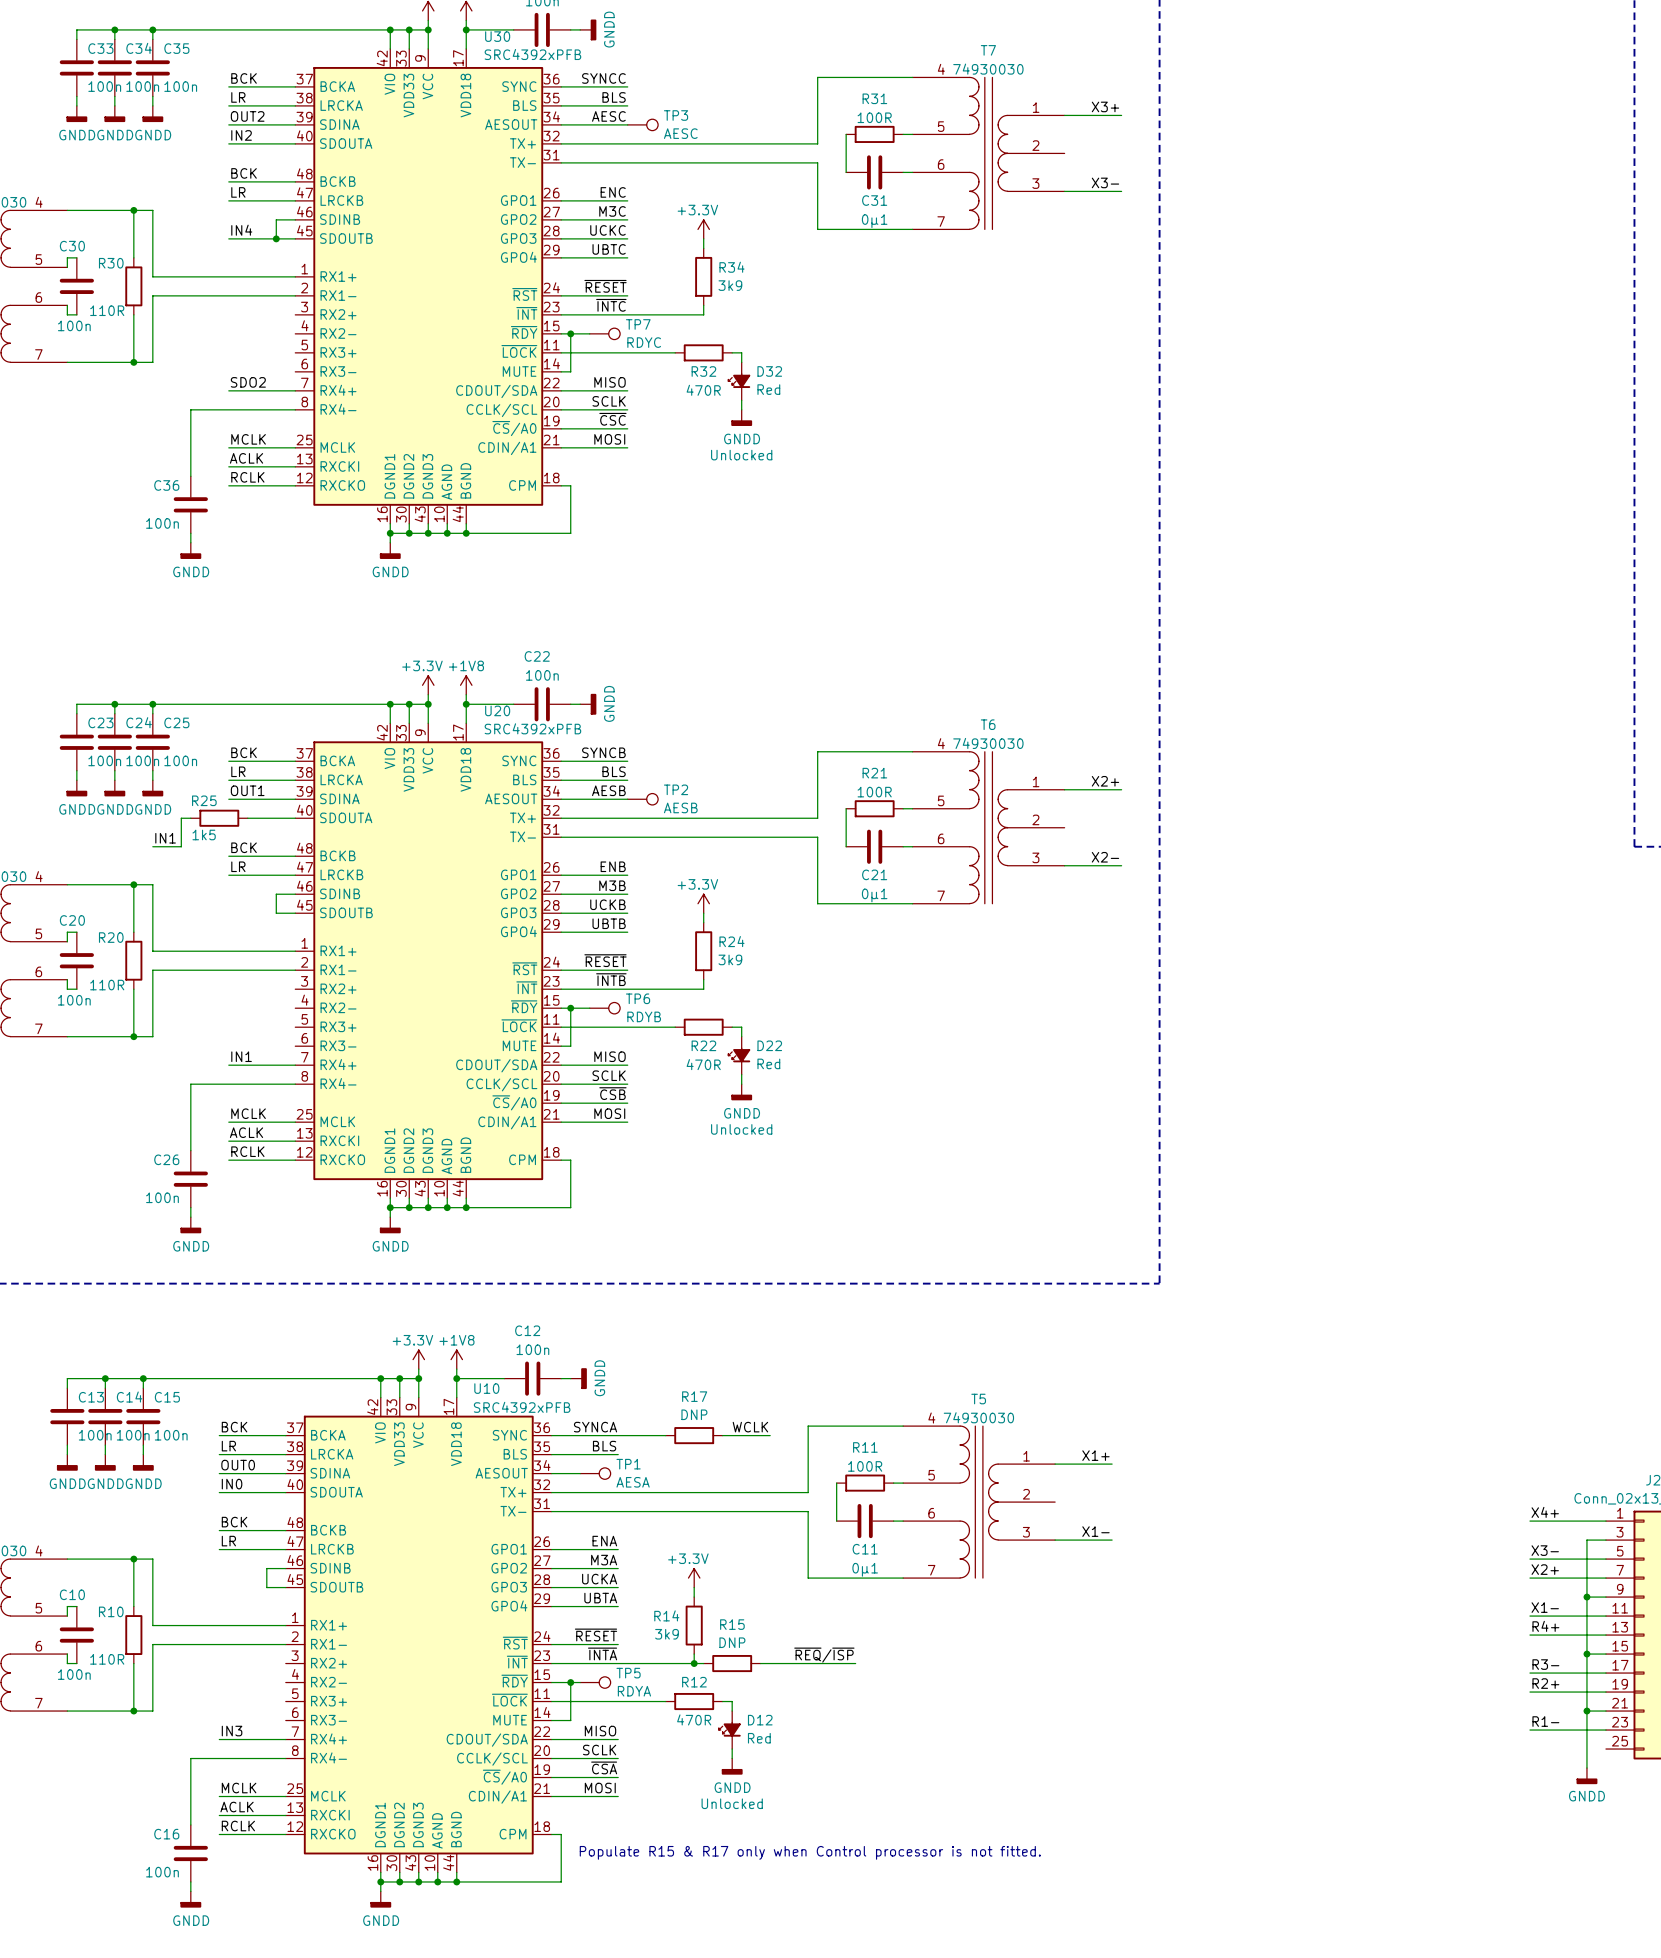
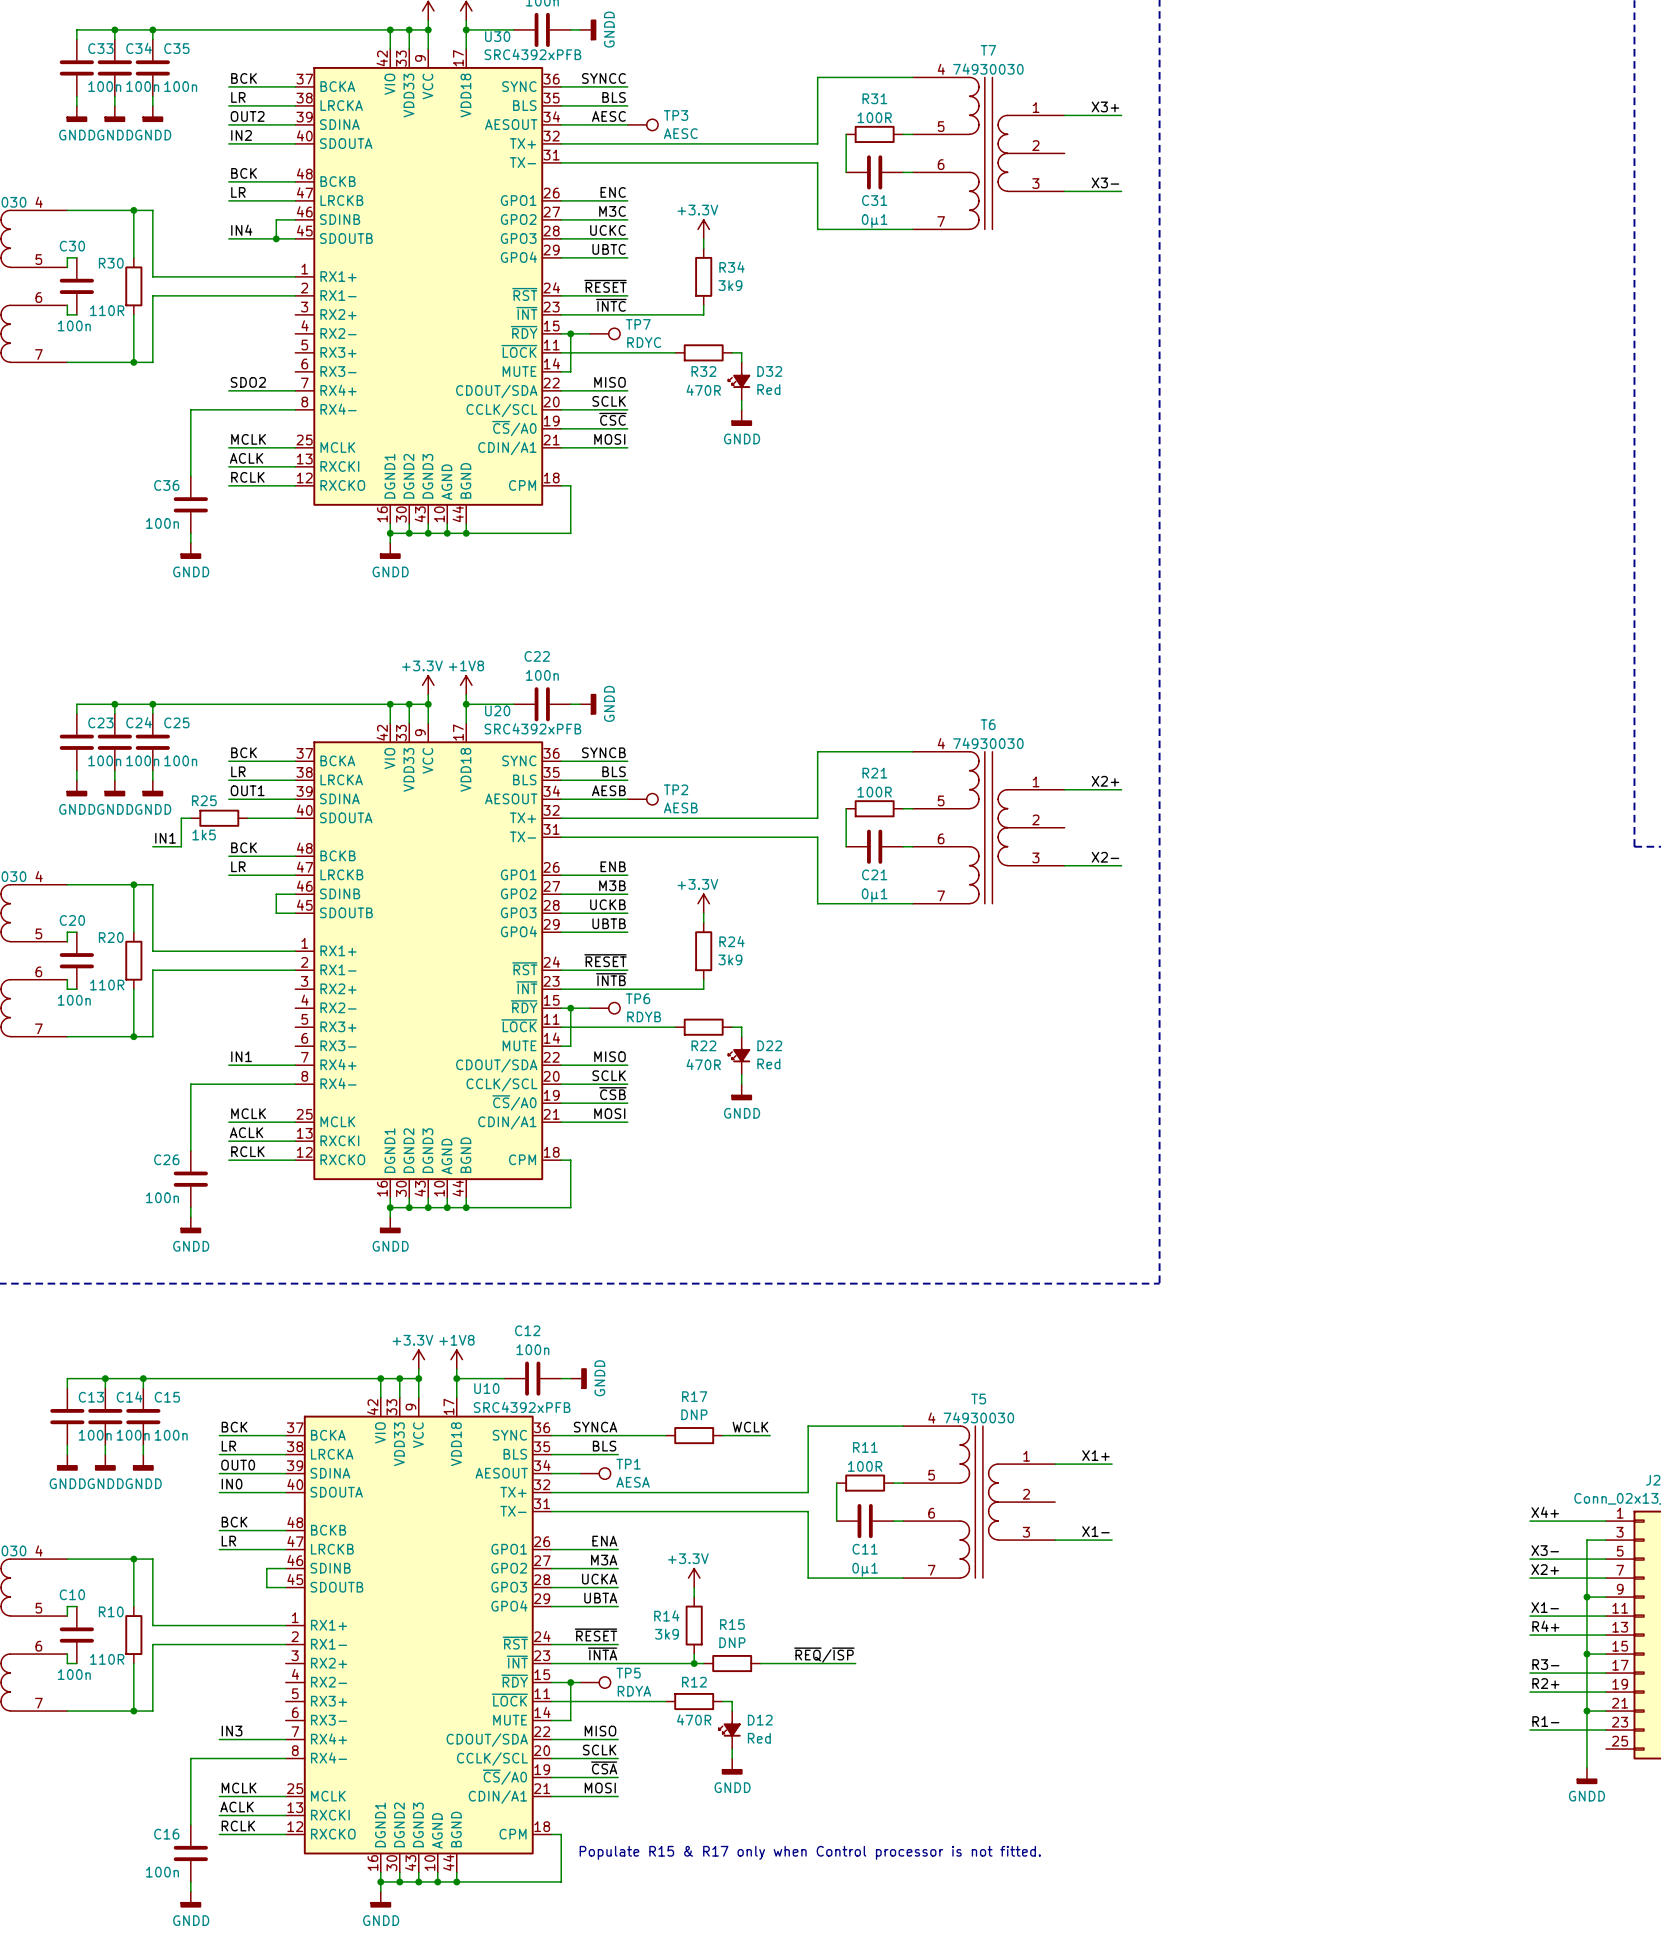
D32 text: Unlocked (741, 455) -> none
D22 text: Unlocked (741, 1129) -> none
D12 text: Unlocked (732, 1803) -> none

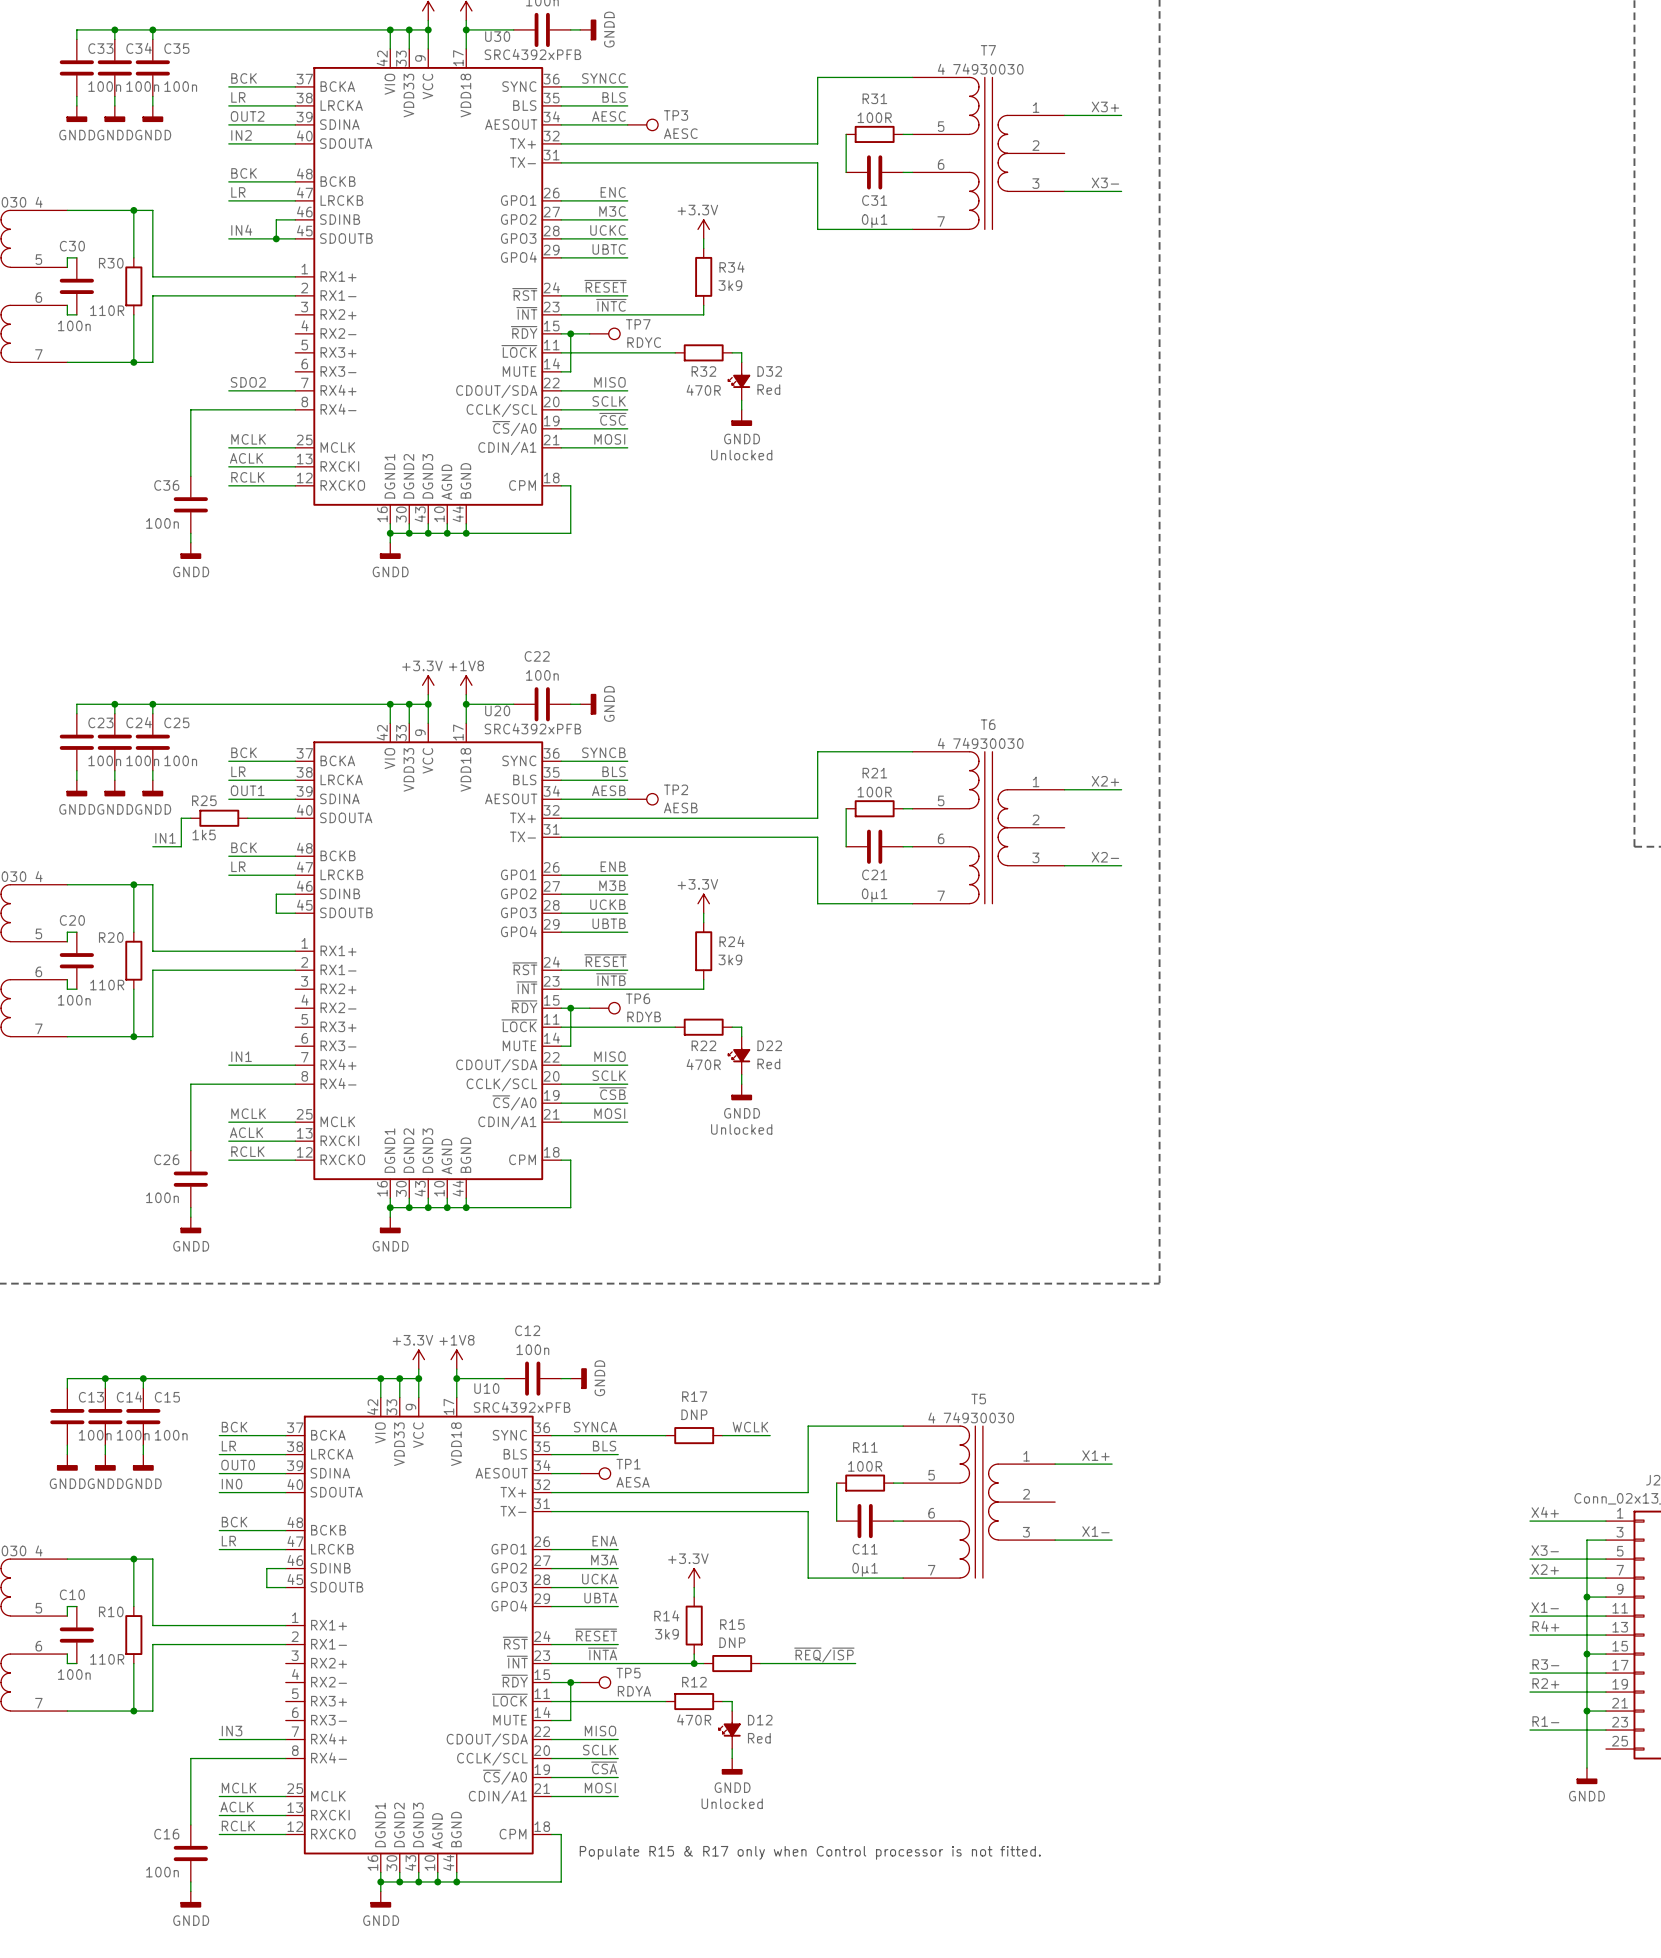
D32 text: none -> Unlocked (741, 455)
D22 text: none -> Unlocked (741, 1129)
D12 text: none -> Unlocked (732, 1803)

